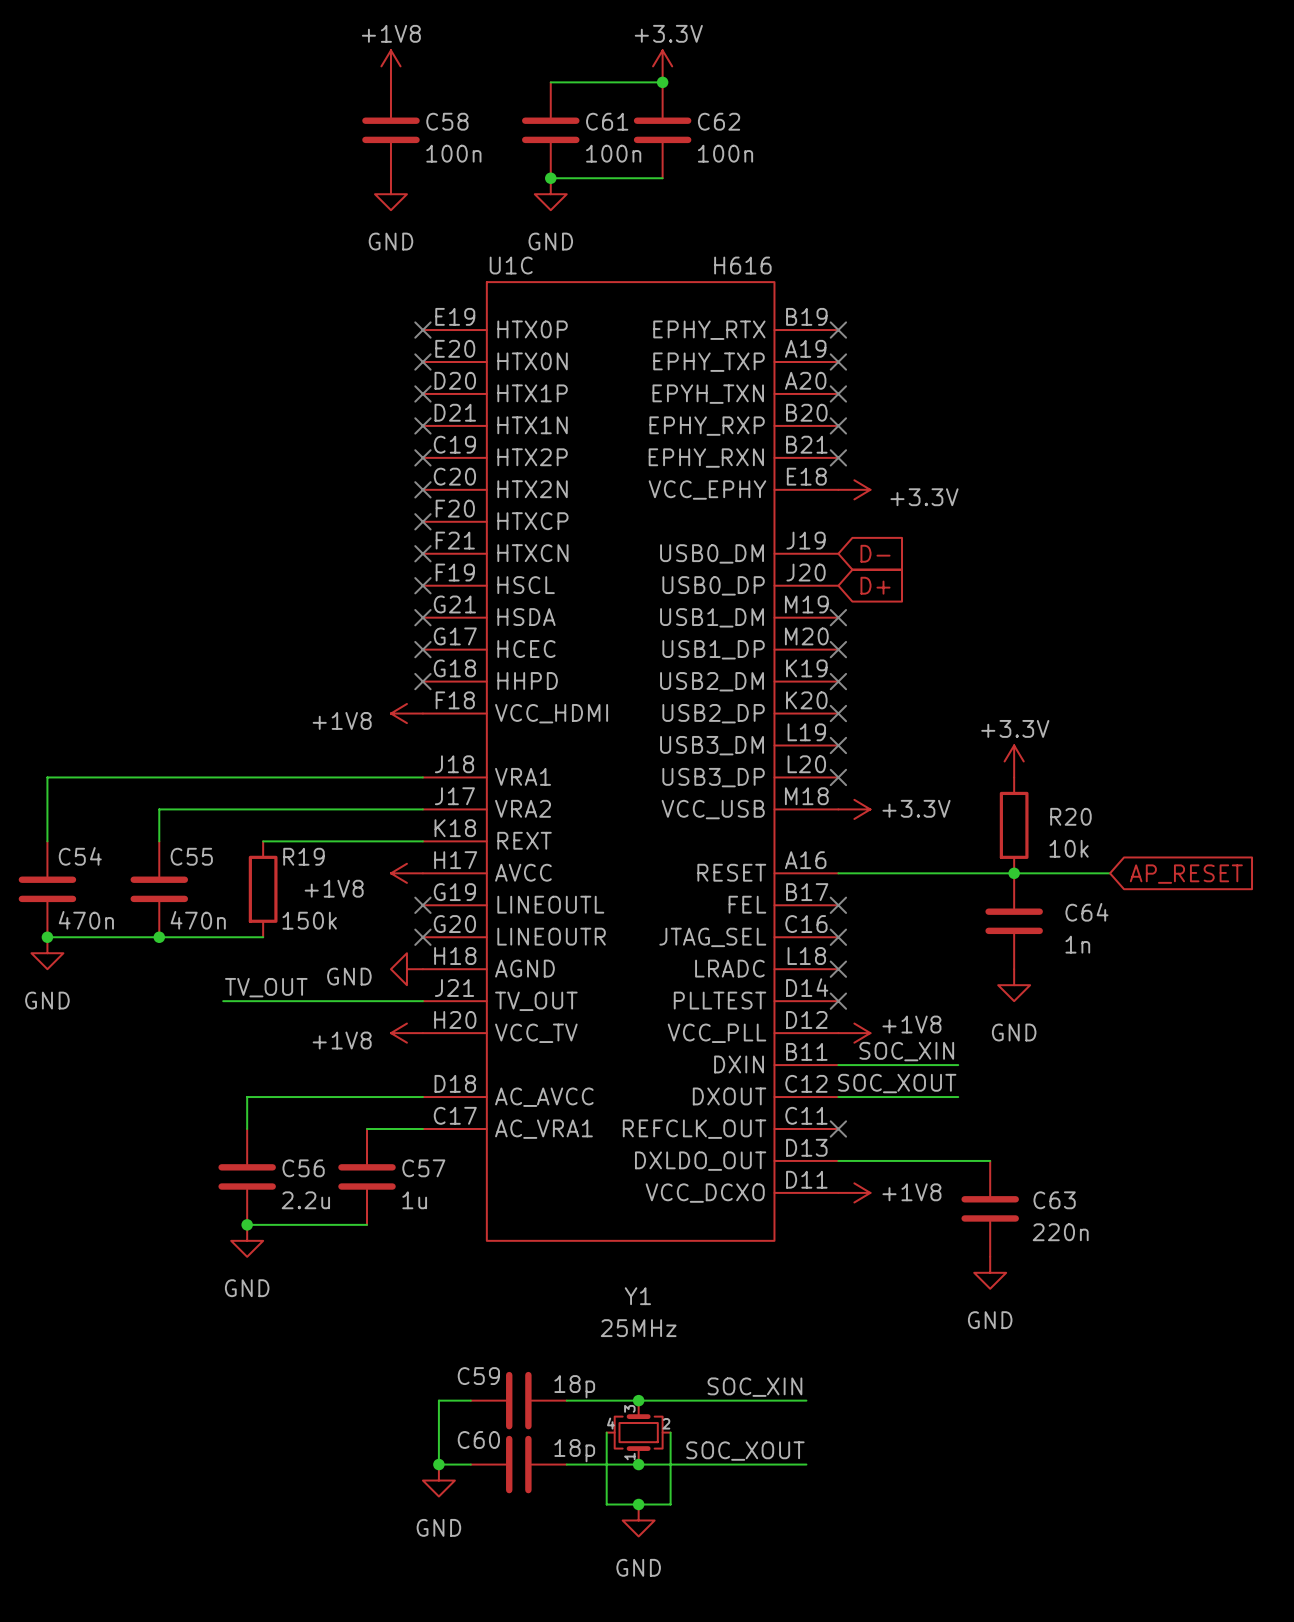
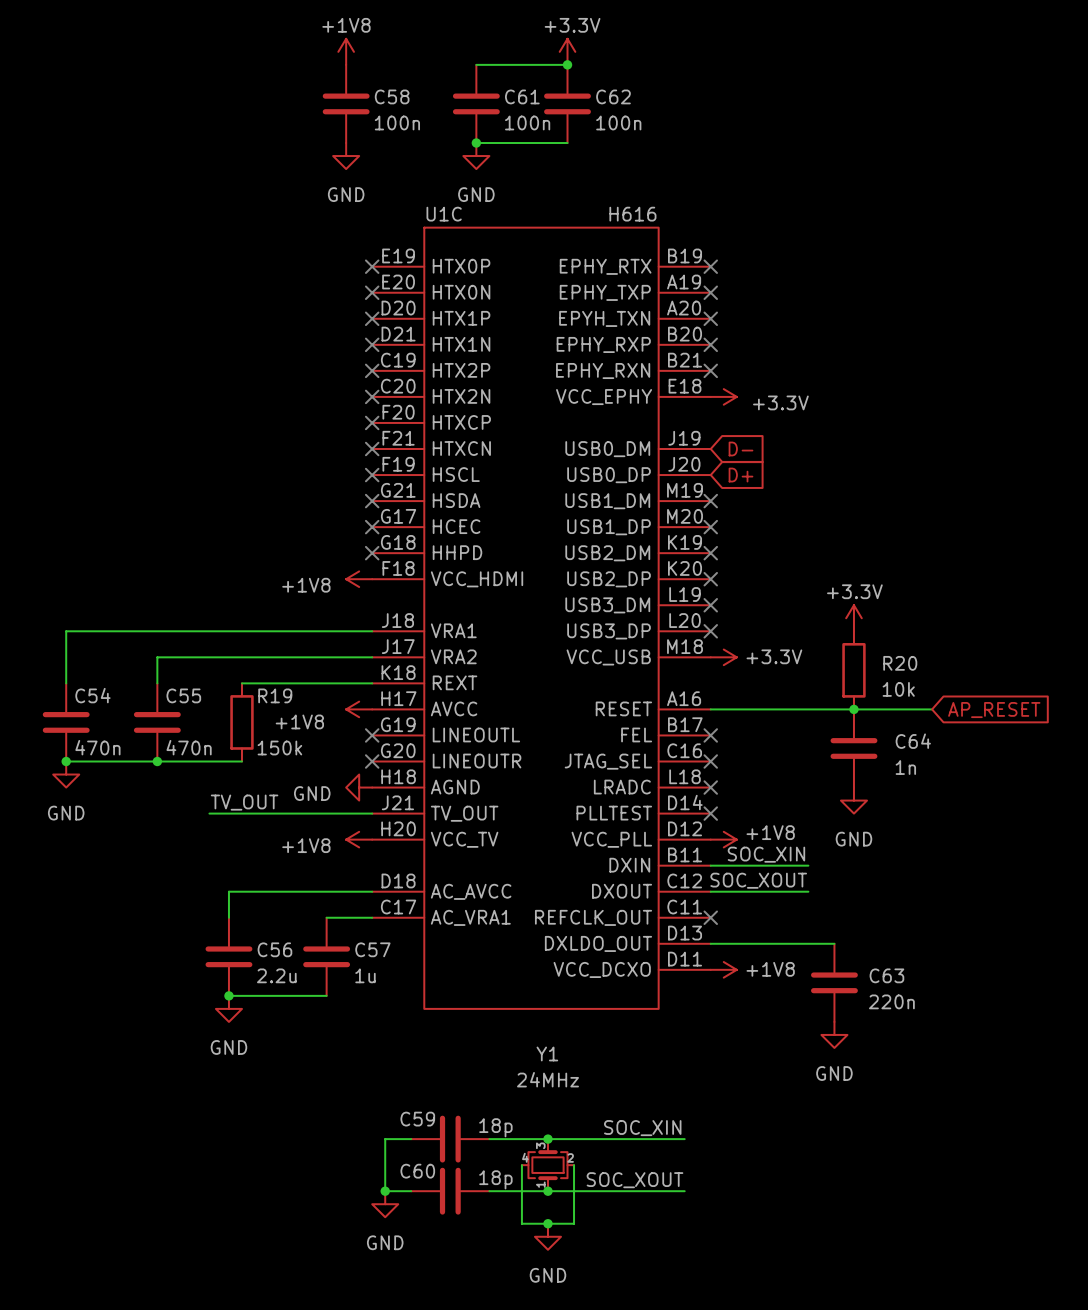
Y1 value: 25MHz (638, 1328) -> 24MHz (547, 1079)

